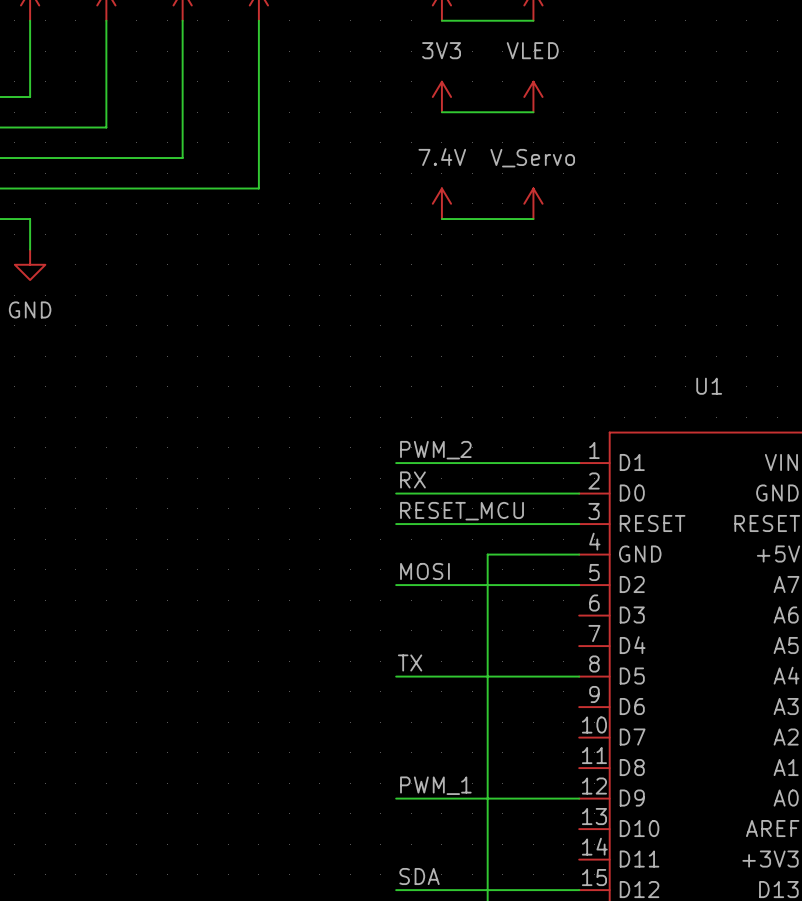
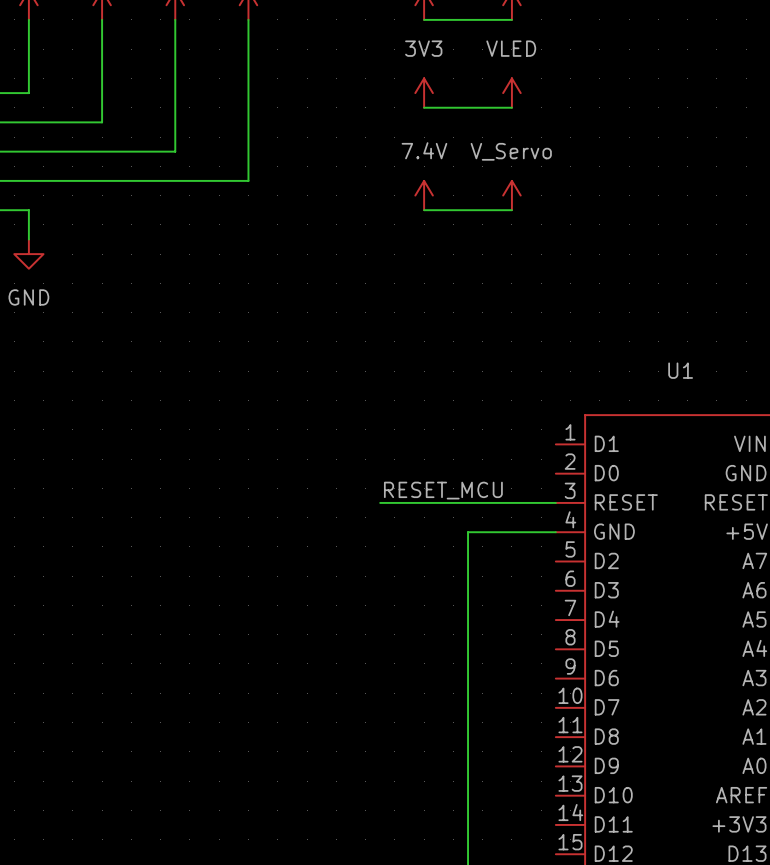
label: PWM_2 (435, 450) -> none
wire: (396, 463) (579, 463) -> none
label: RX (412, 479) -> none
wire: (396, 493) (579, 493) -> none
label: MOSI (424, 571) -> none
wire: (396, 585) (579, 585) -> none
label: TX (410, 662) -> none
wire: (396, 676) (579, 676) -> none
label: PWM_1 (435, 785) -> none
wire: (396, 798) (579, 798) -> none
label: SDA (419, 876) -> none
wire: (396, 890) (579, 890) -> none

